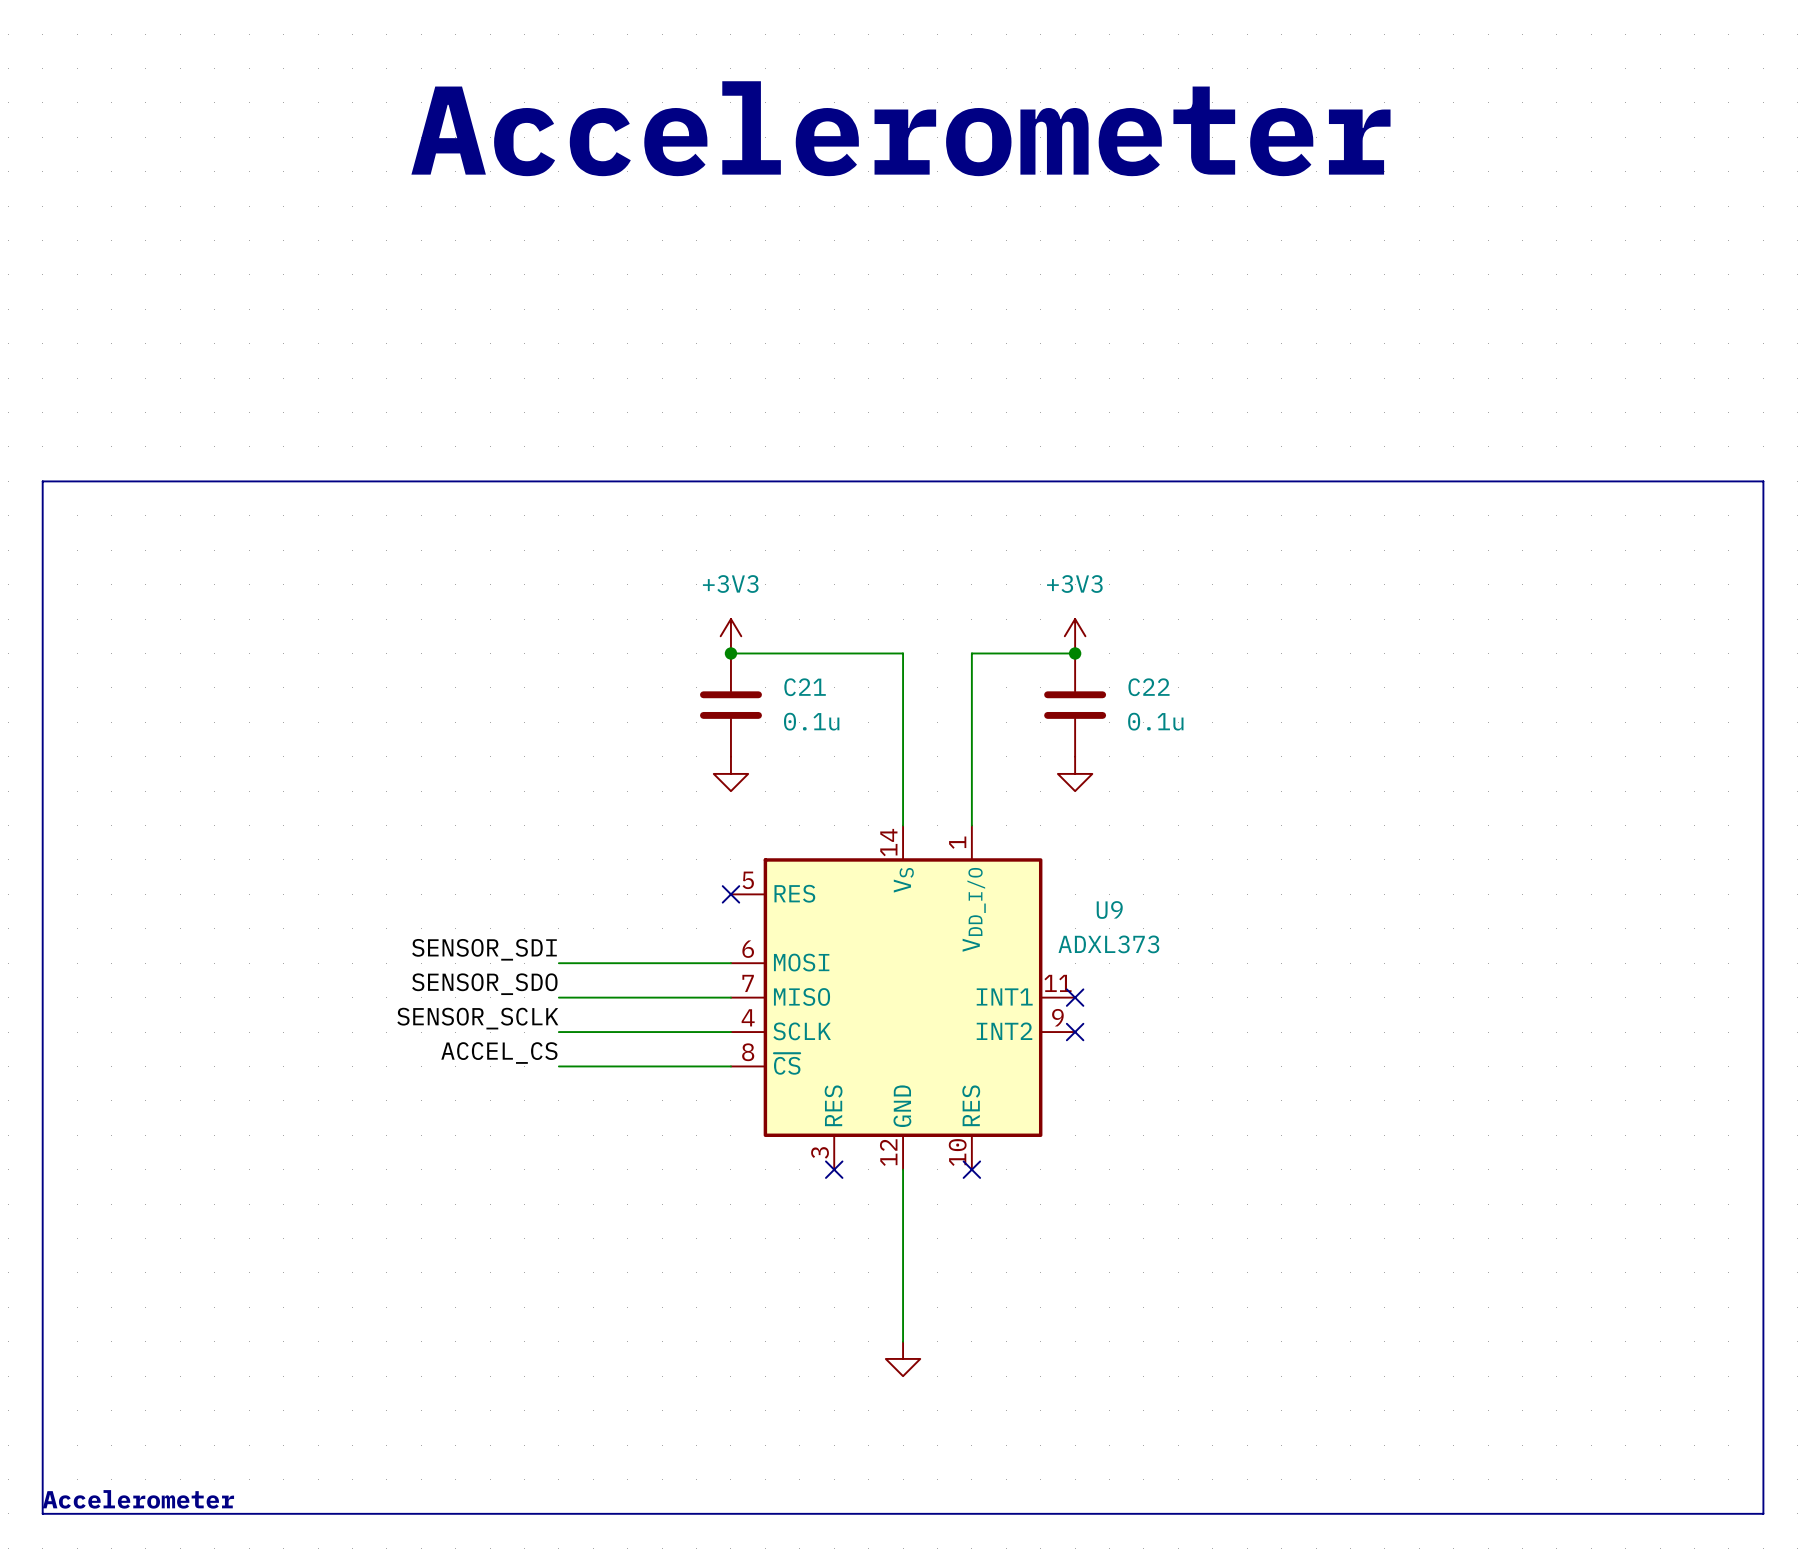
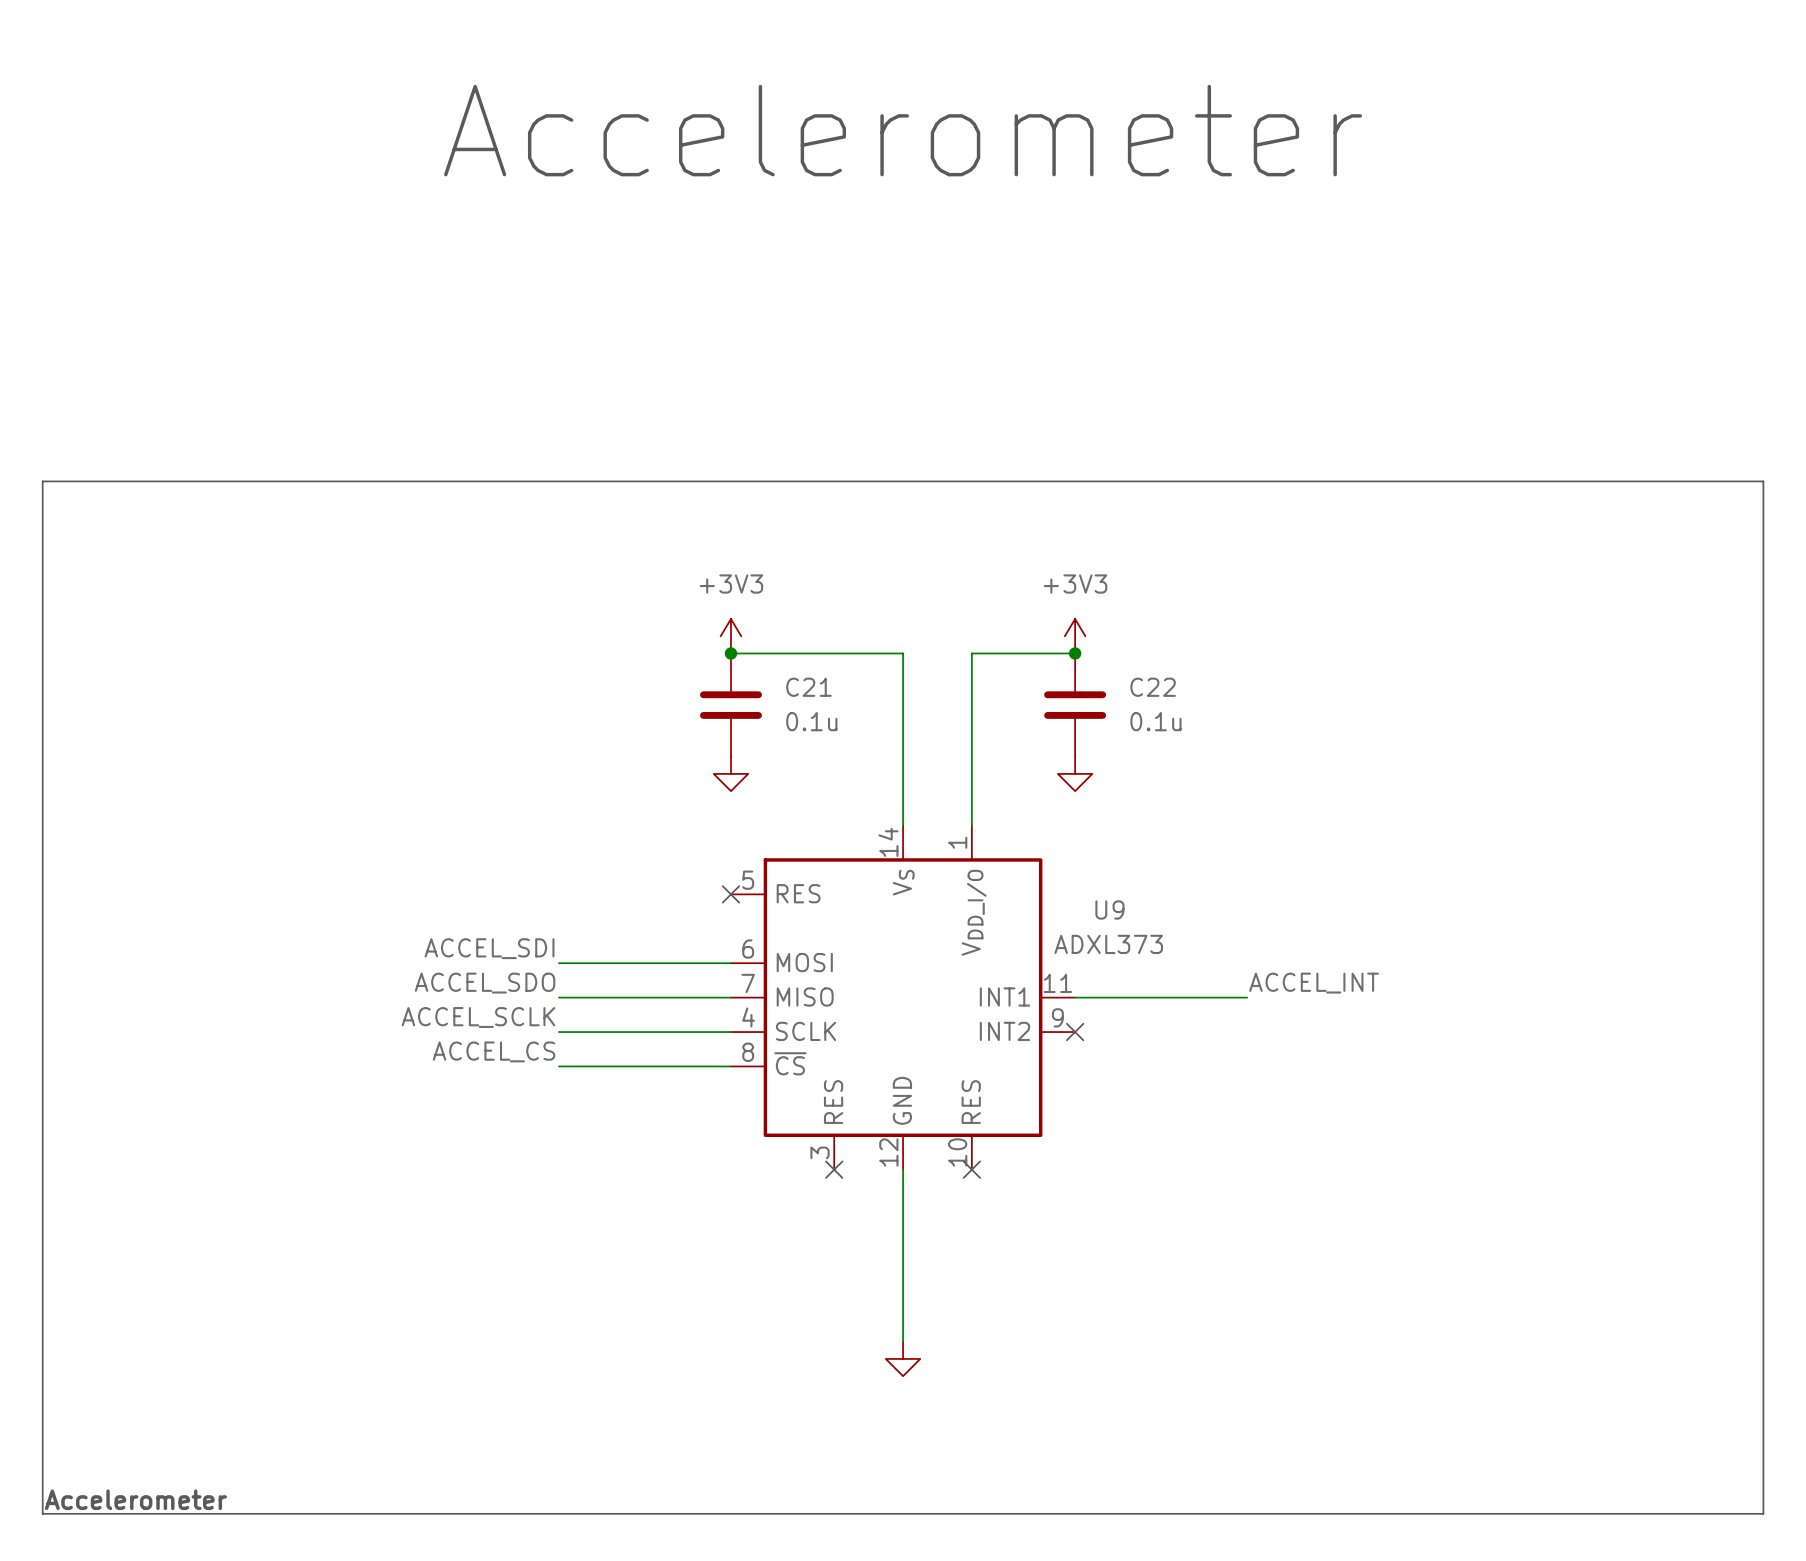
label: SENSOR_SDI (484, 949) -> ACCEL_SDI (489, 948)
label: SENSOR_SDO (484, 984) -> ACCEL_SDO (485, 983)
label: none -> ACCEL_INT (1314, 983)
wire: none -> (1075, 997) (1247, 997)
no-connect mark: (1075, 997) -> none
label: SENSOR_SCLK (477, 1018) -> ACCEL_SCLK (478, 1017)

